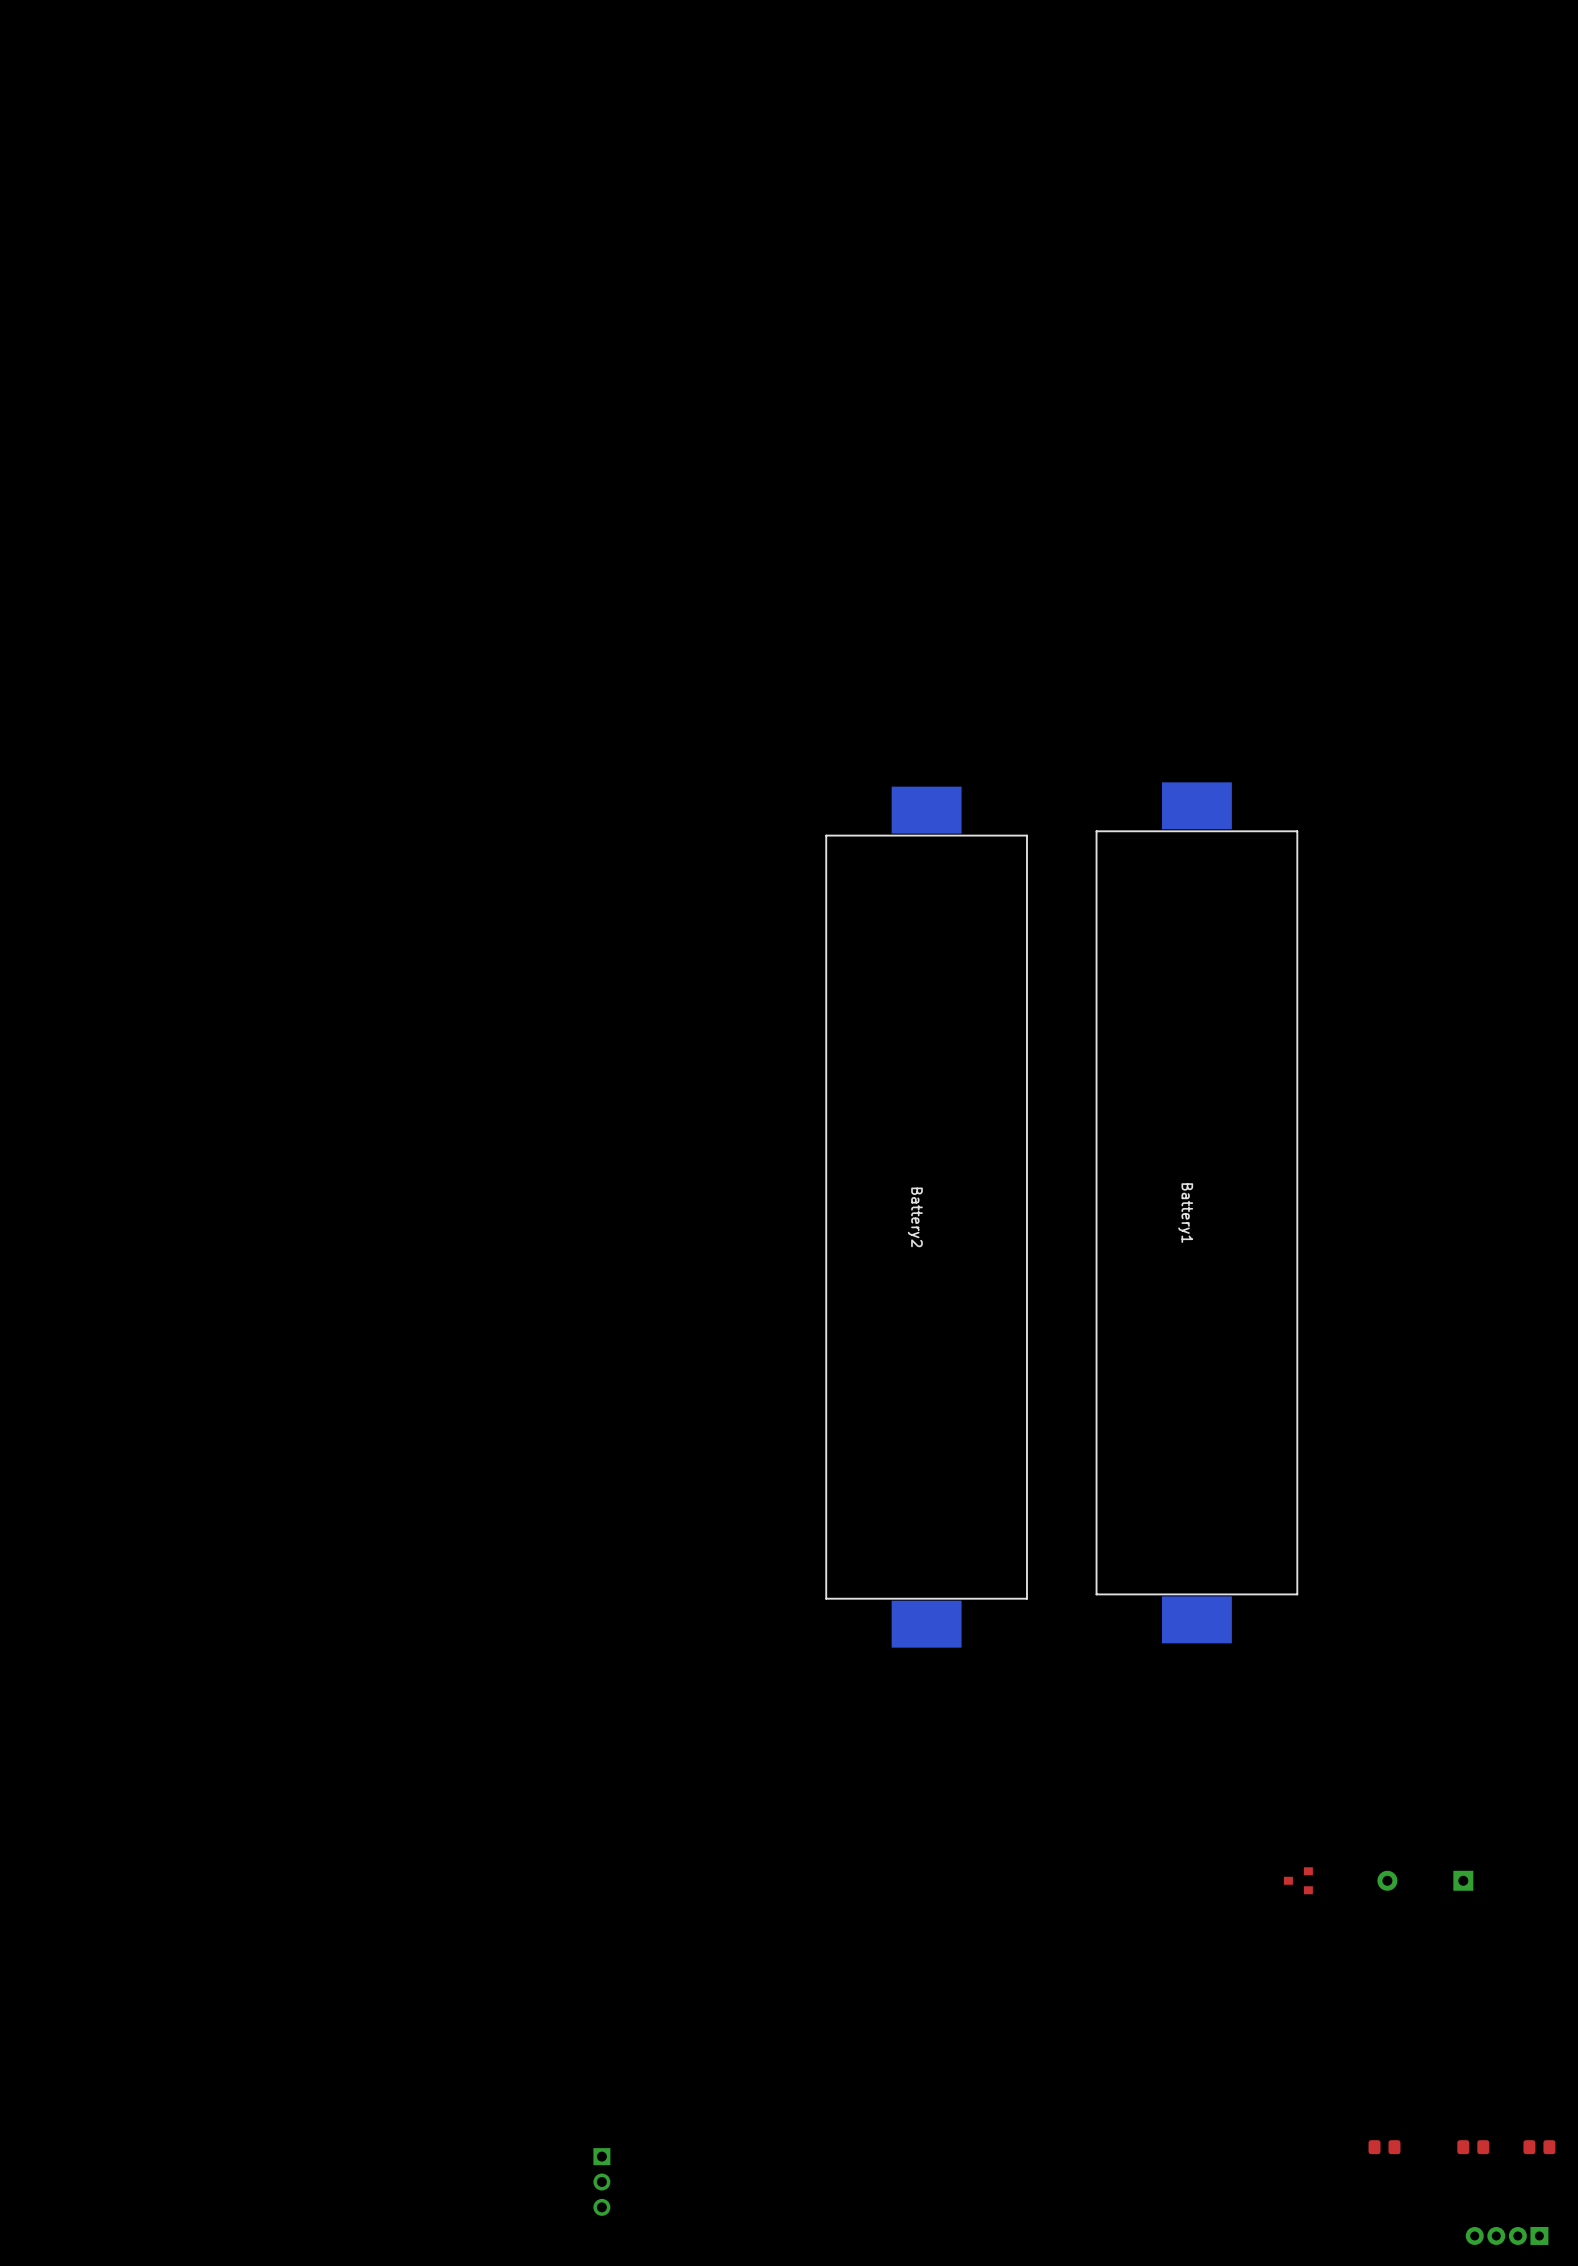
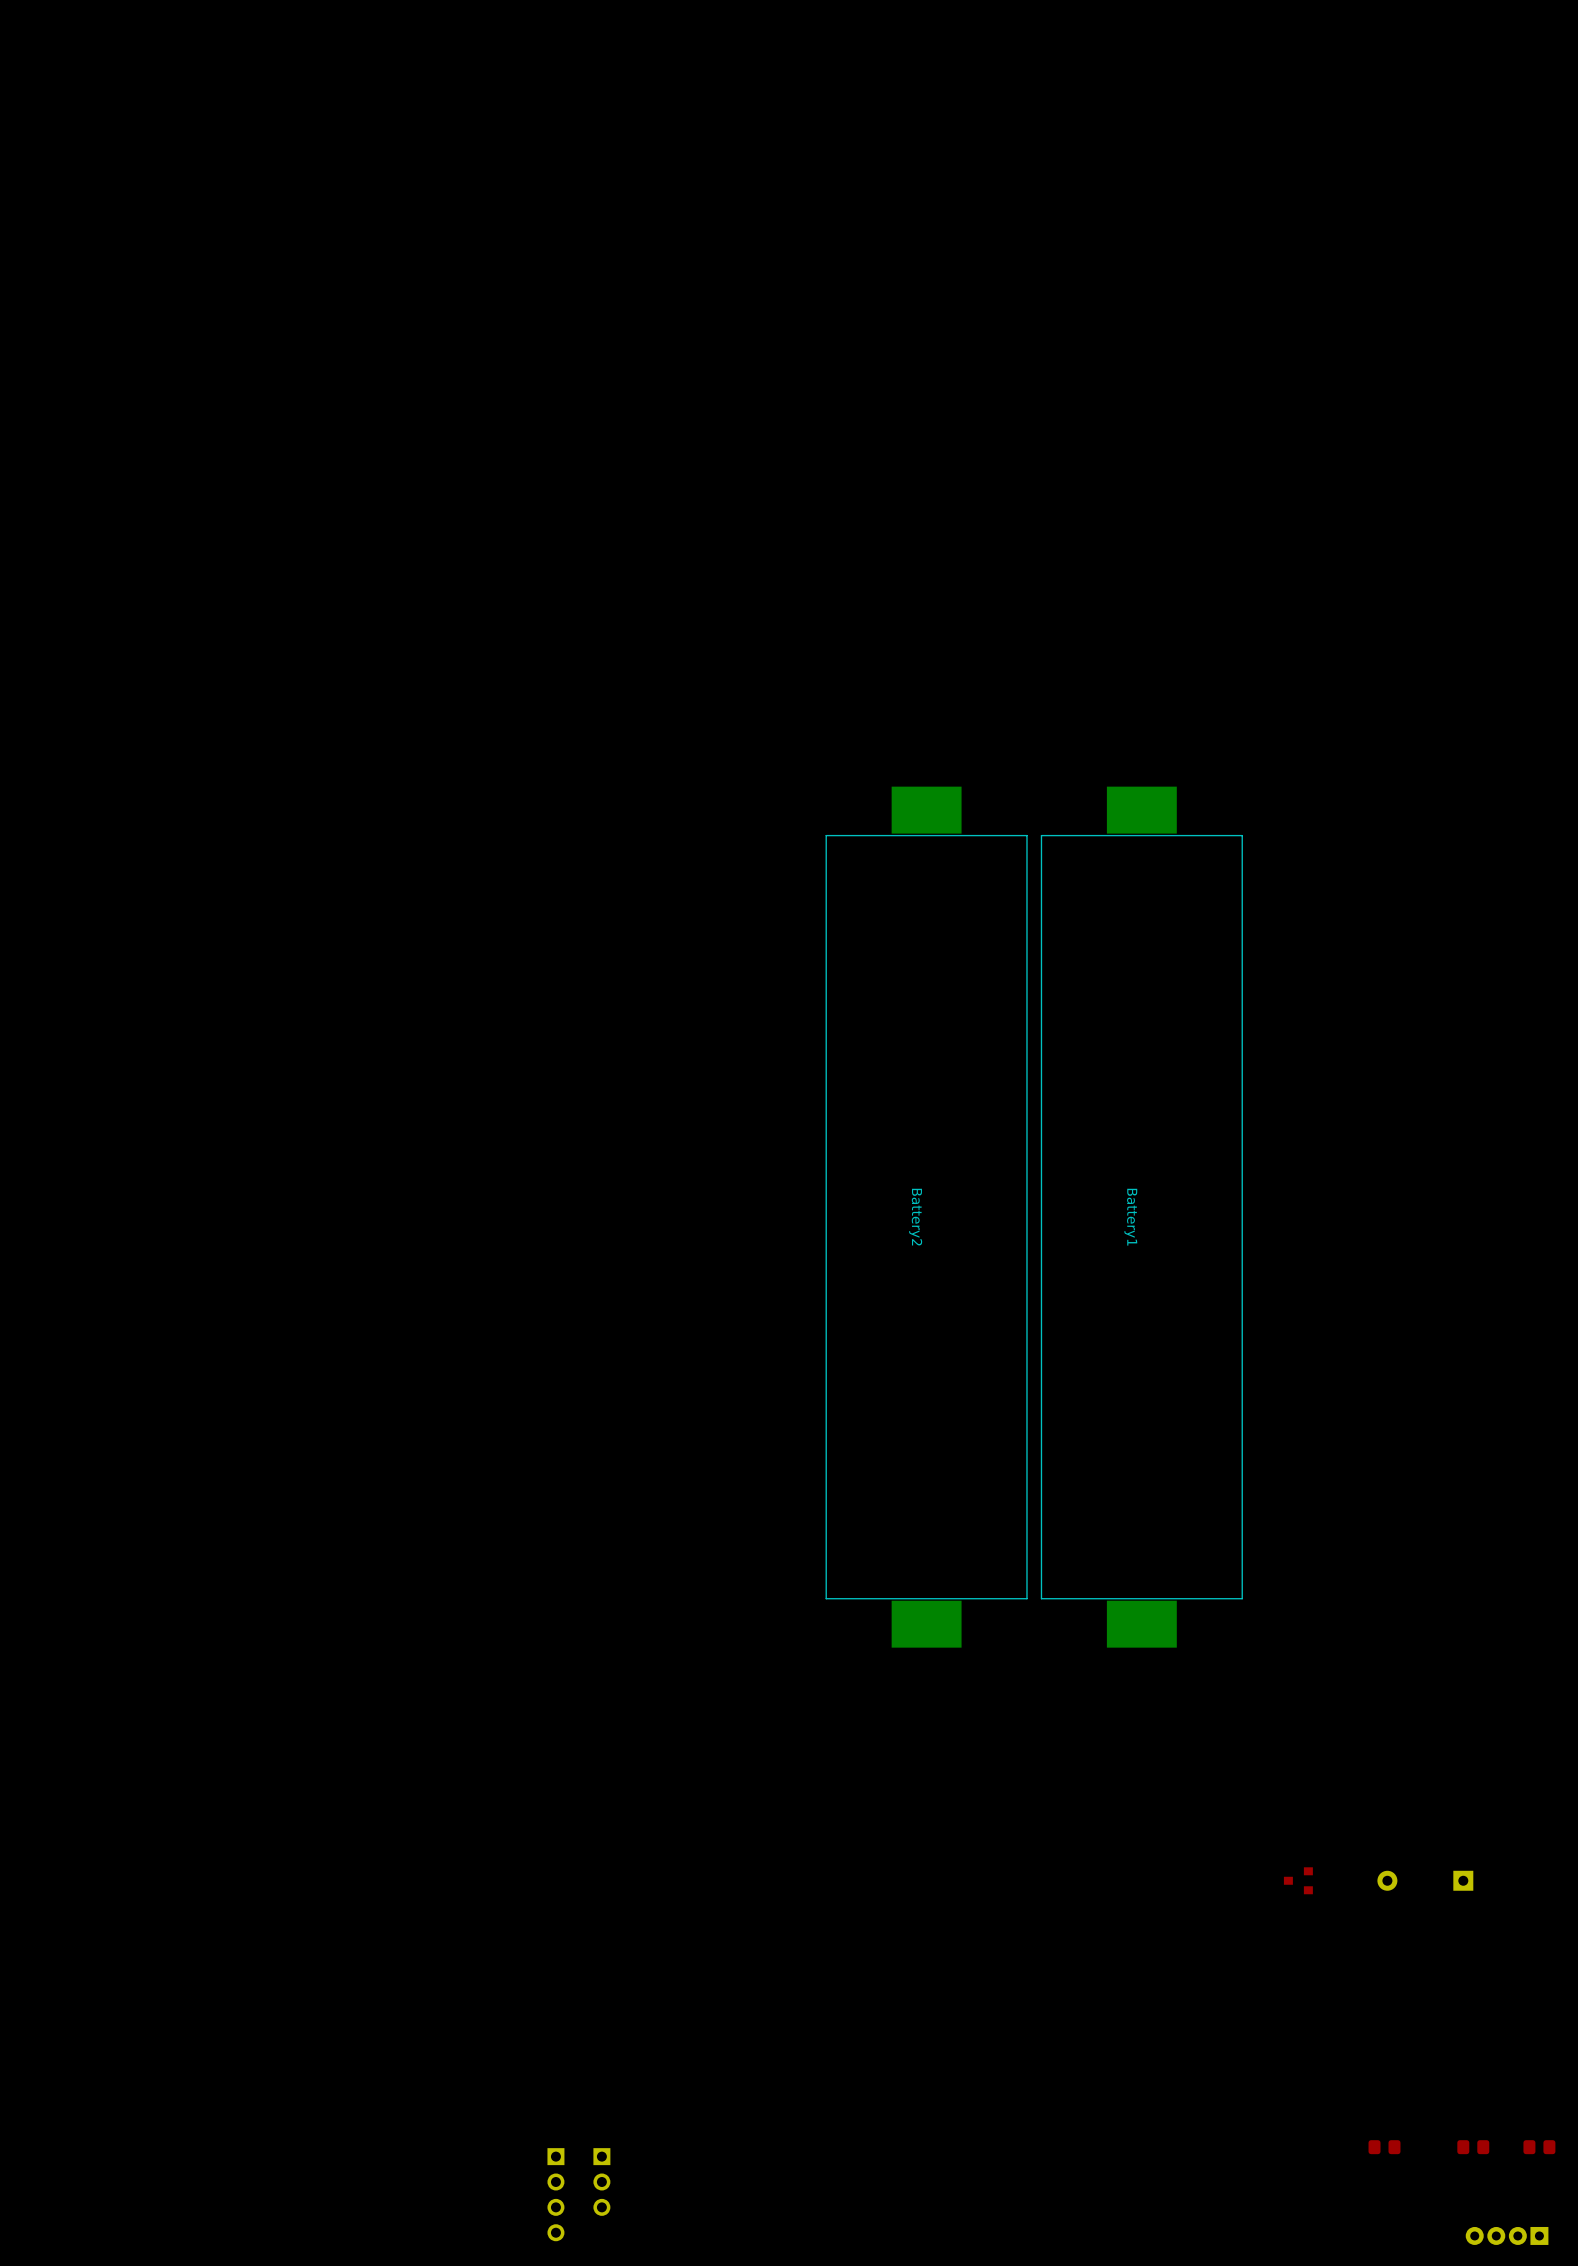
Battery1 position: (1196, 1212) -> (1141, 1217)
part: none -> (555, 2194)

